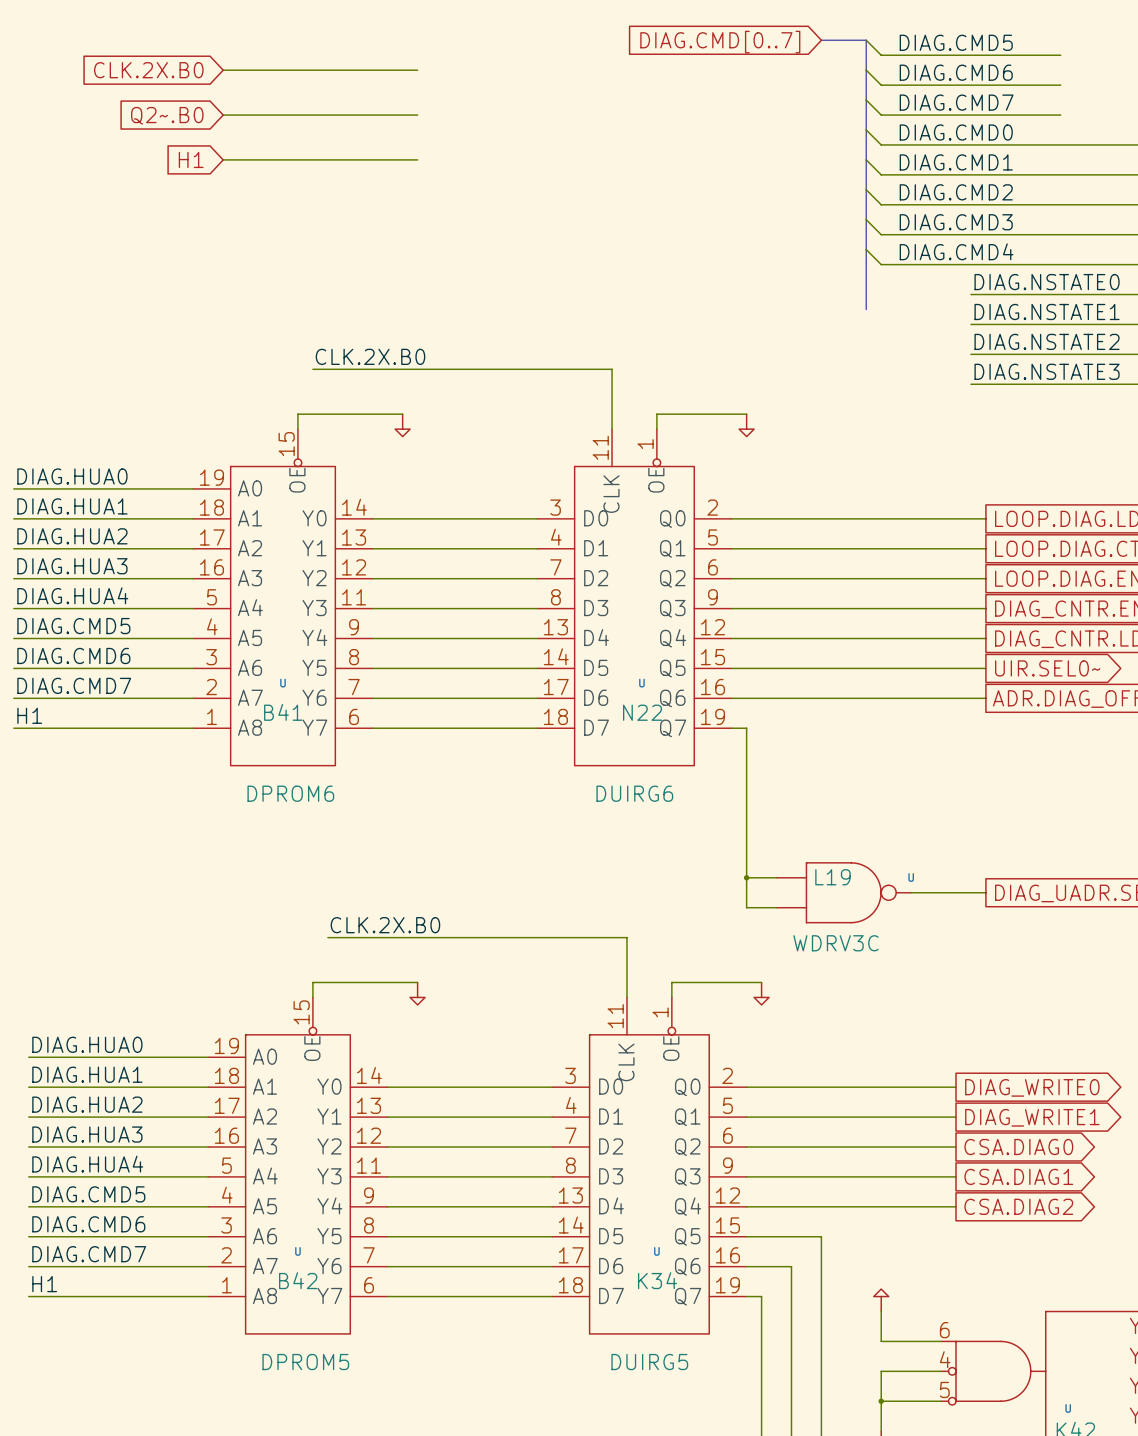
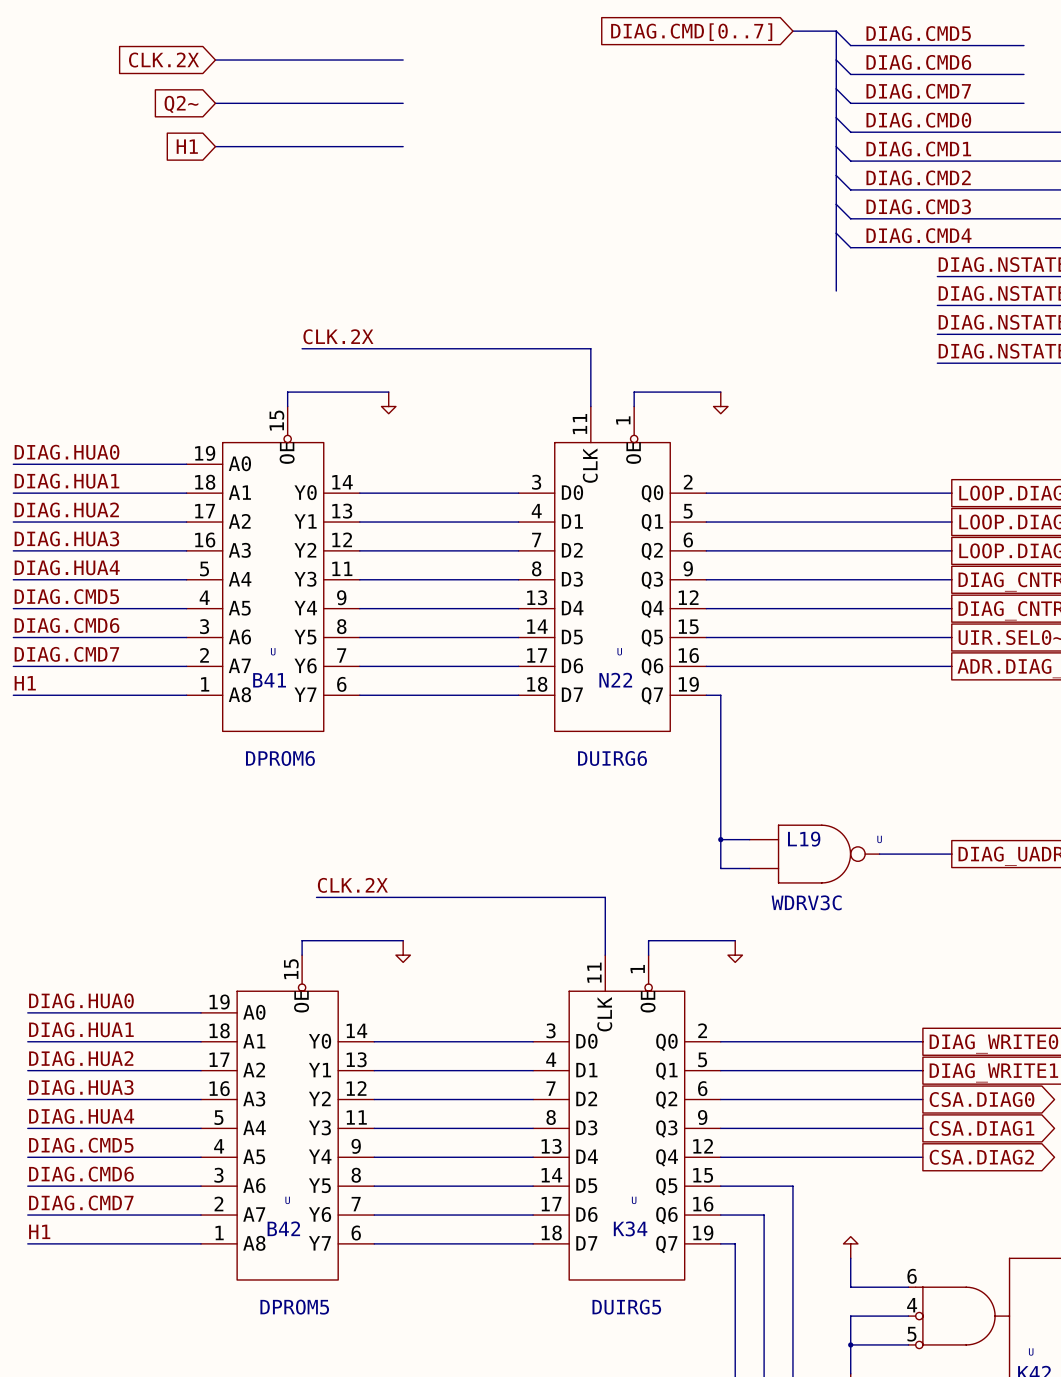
global label: CLK.2X.B0 (148, 70) -> CLK.2X (164, 60)
global label: Q2~.B0 (167, 115) -> Q2~ (181, 104)
label: CLK.2X.B0 (370, 356) -> CLK.2X (338, 336)
label: CLK.2X.B0 (385, 925) -> CLK.2X (352, 885)

